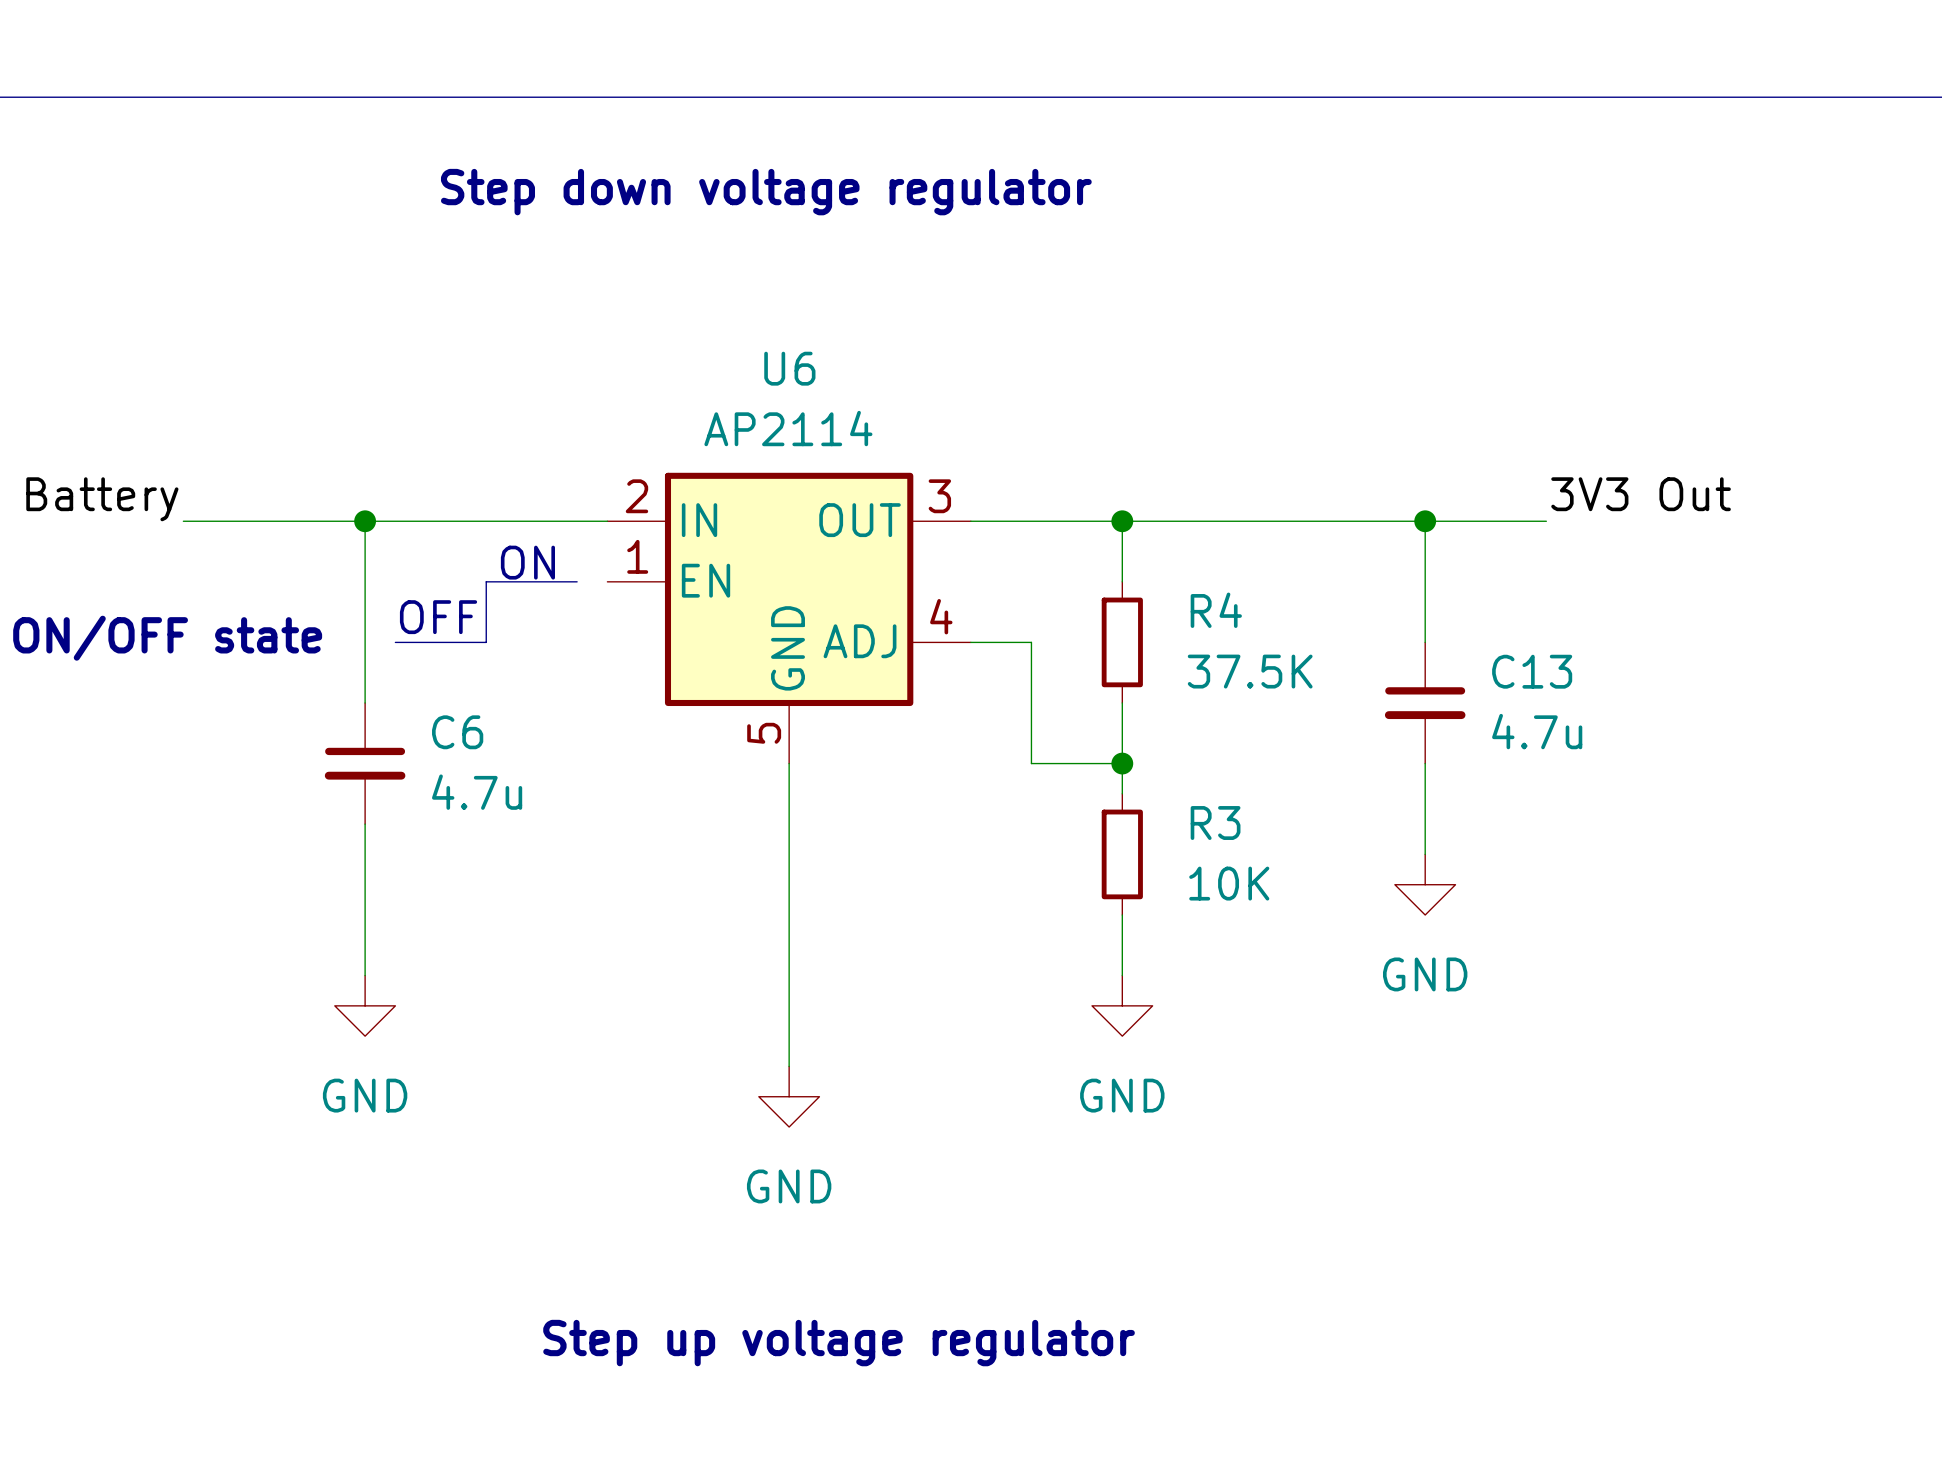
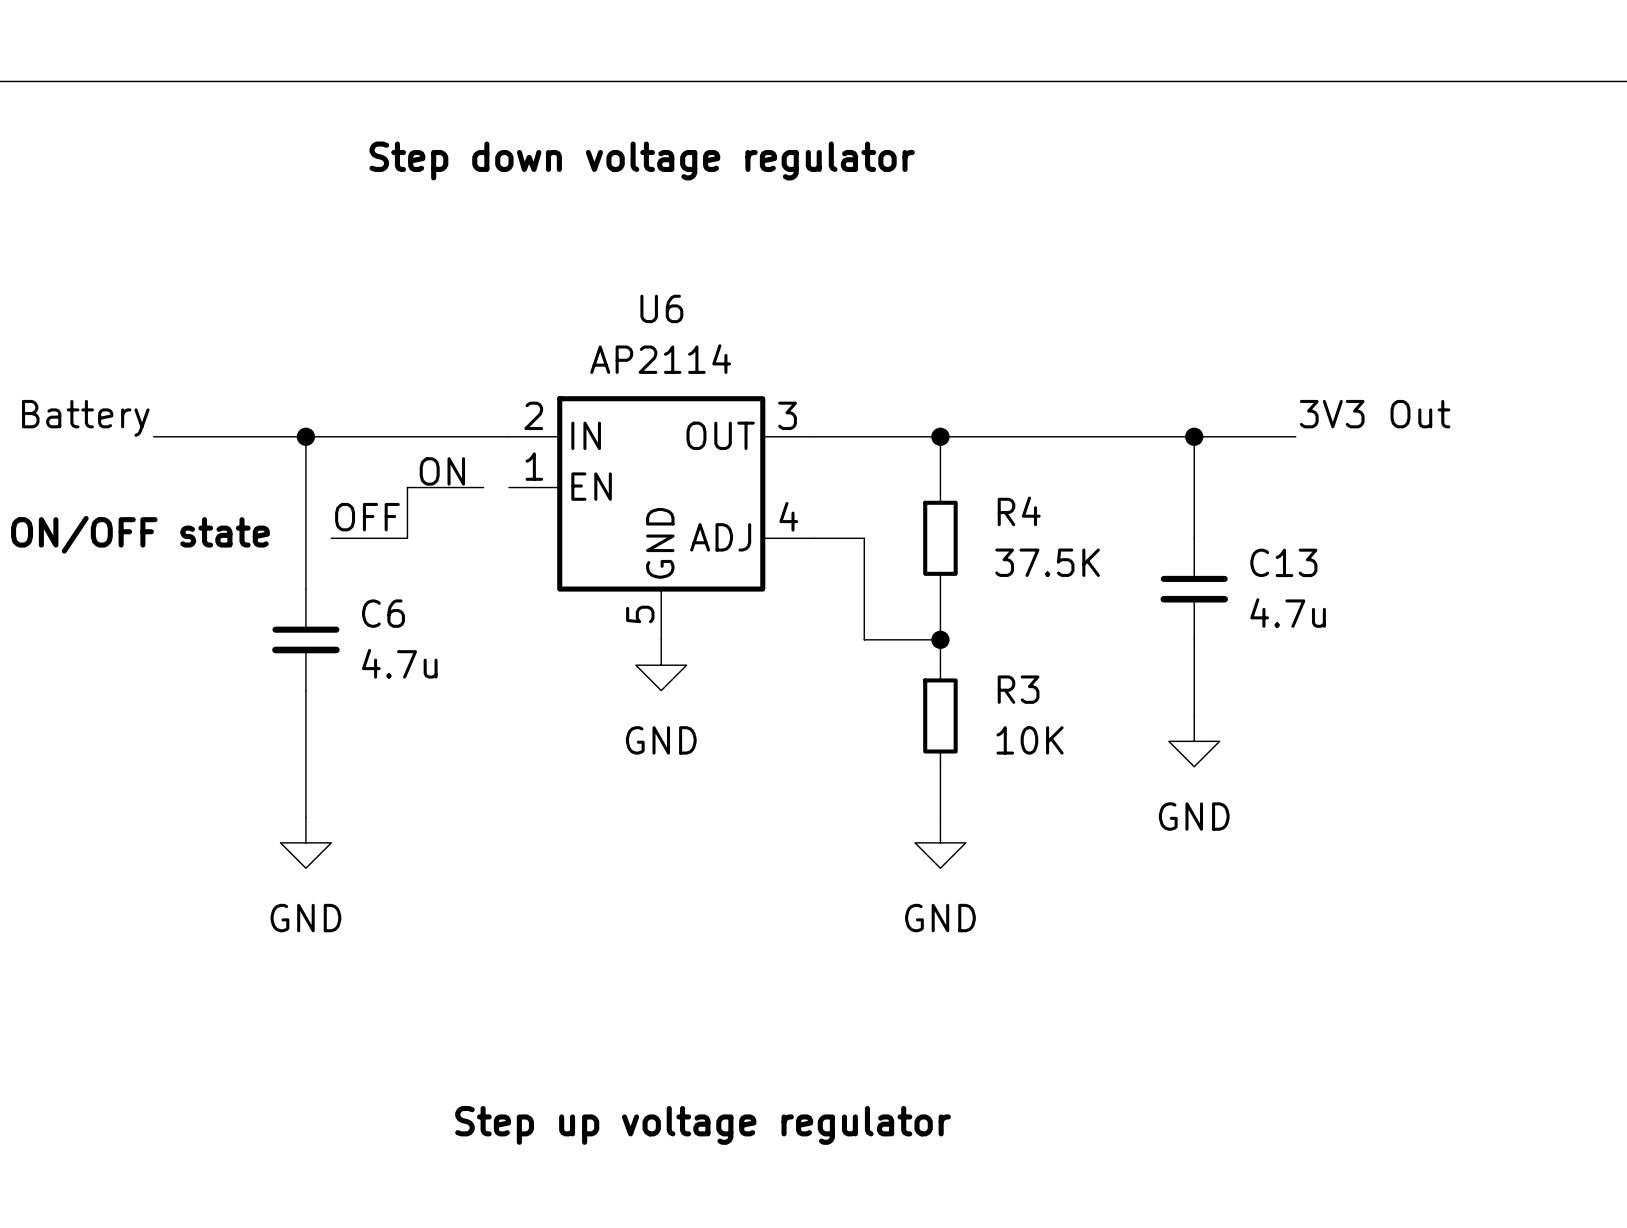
wire: (789, 763) (789, 1066) -> none
power symbol position: GND (789, 1096) -> GND (661, 665)

